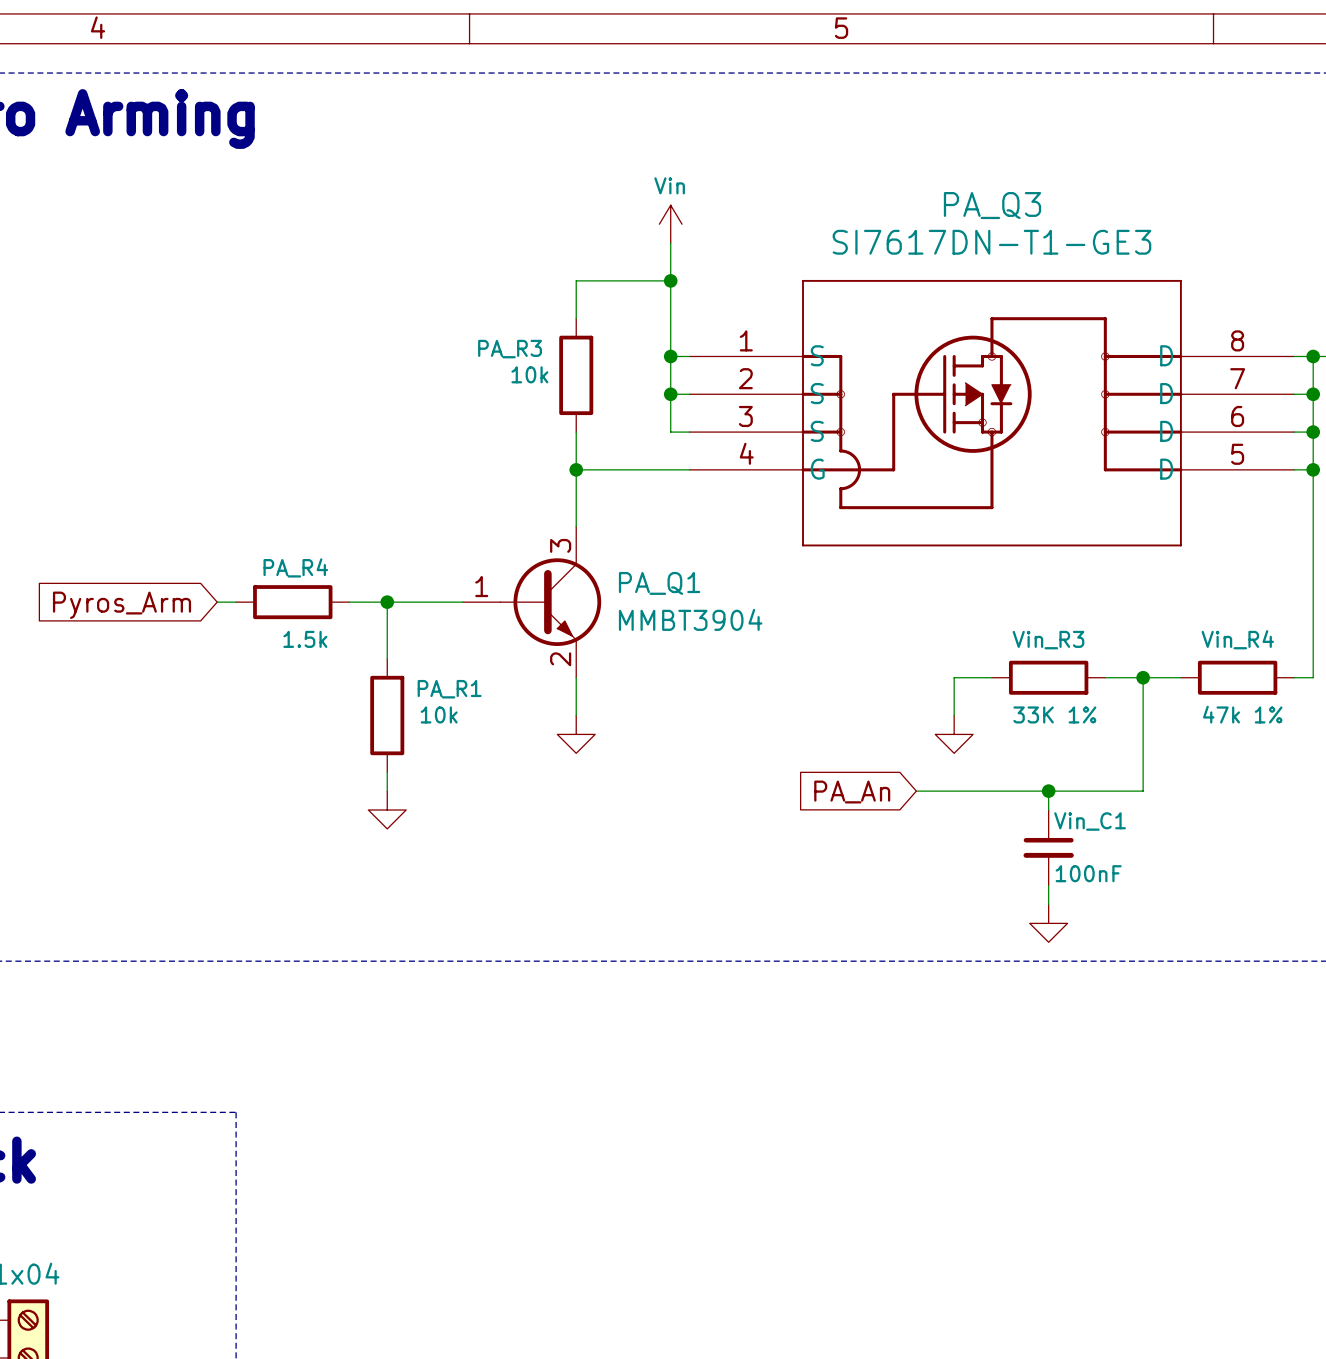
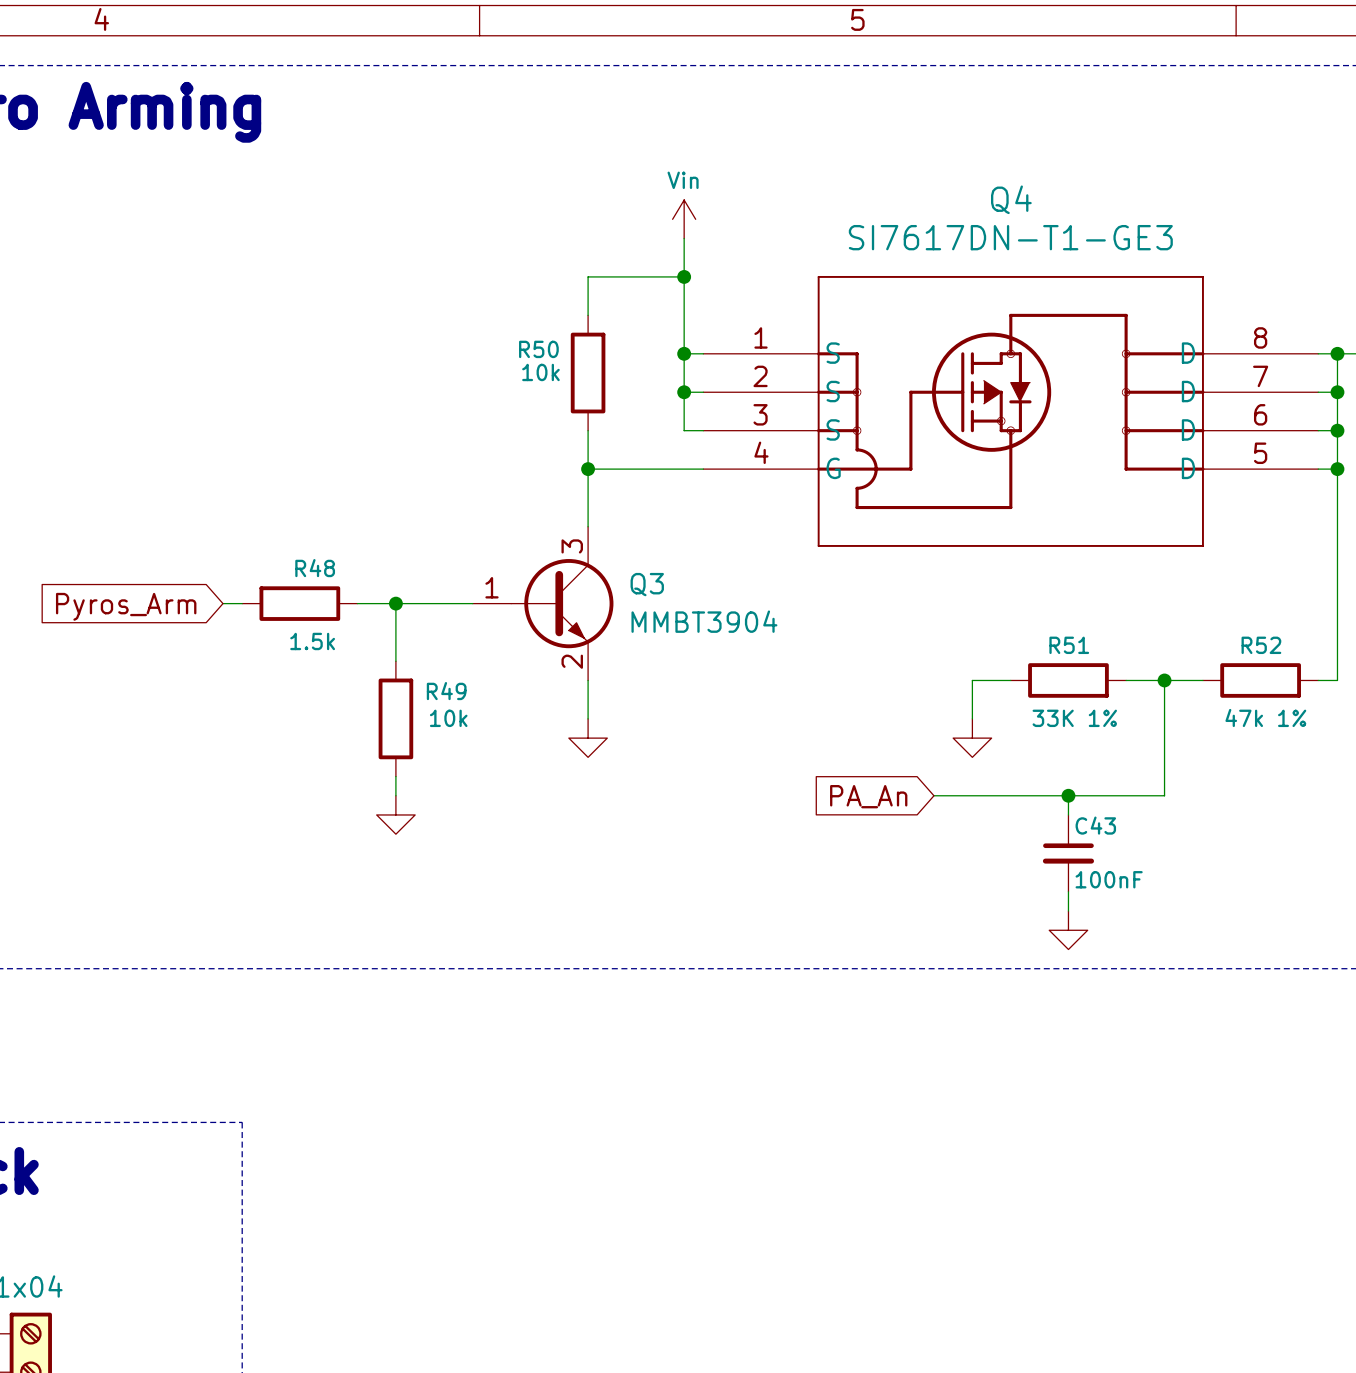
PA_Q3 name: PA_Q3 (992, 205) -> Q4 (1011, 199)
PA_R3 name: PA_R3 (510, 349) -> R50 (538, 349)
PA_R4 name: PA_R4 (295, 567) -> R48 (315, 568)
PA_Q1 name: PA_Q1 (659, 583) -> Q3 (647, 584)
Vin_R4 name: Vin_R4 (1237, 639) -> R52 (1261, 645)
Vin_R3 name: Vin_R3 (1048, 640) -> R51 (1069, 645)
PA_R1 name: PA_R1 (449, 689) -> R49 (446, 691)
Vin_C1 name: Vin_C1 (1090, 821) -> C43 (1095, 825)

